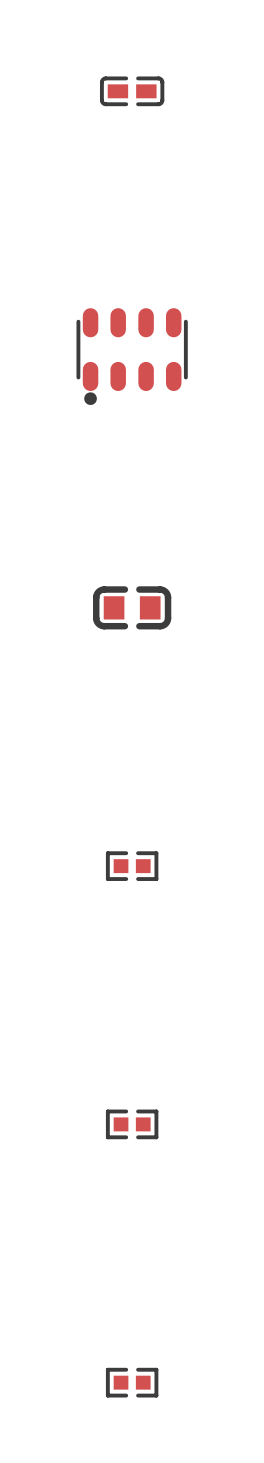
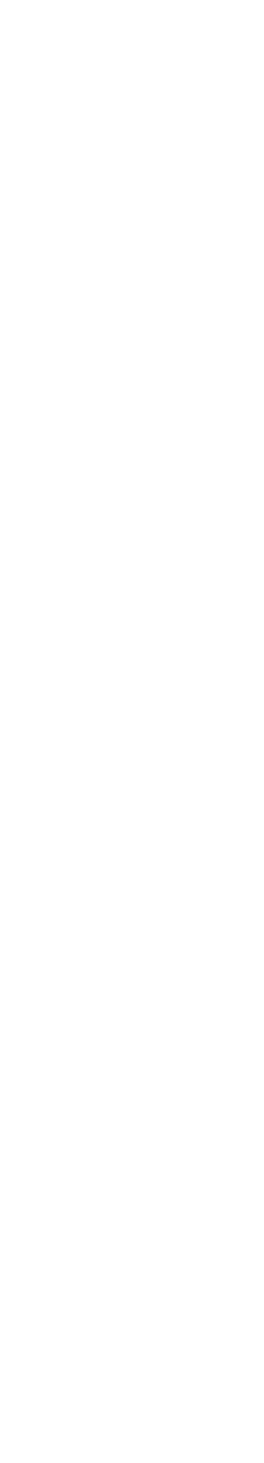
part: (132, 91) -> none
part: (132, 356) -> none
part: (132, 607) -> none
part: (132, 866) -> none
part: (132, 1124) -> none
part: (132, 1382) -> none

